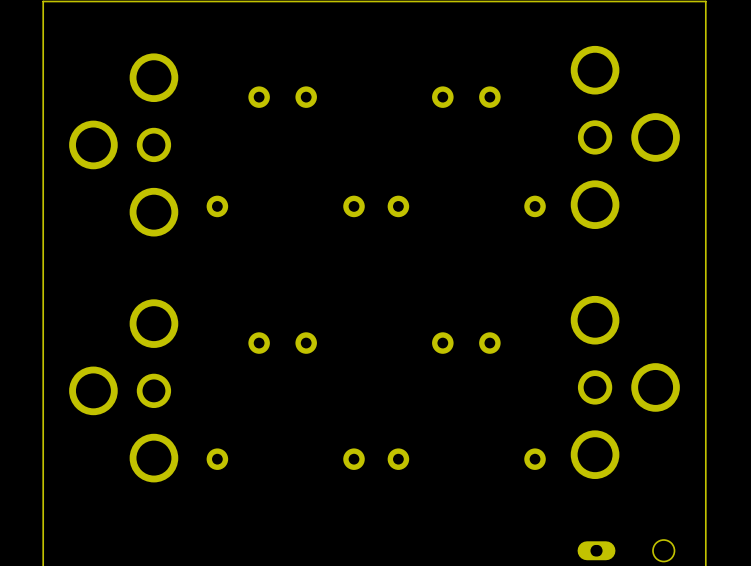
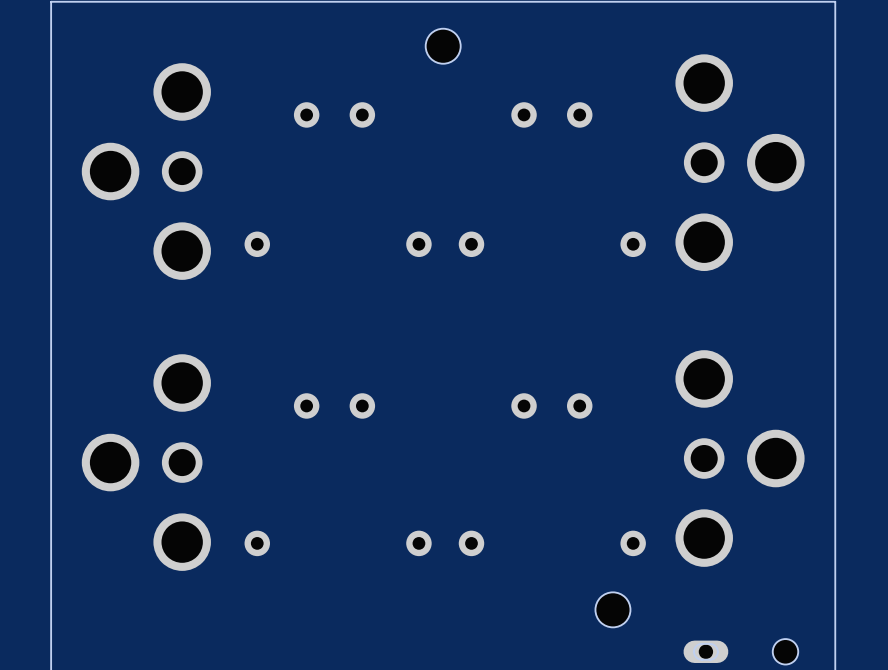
part: none -> (443, 46)
part: none -> (612, 609)

